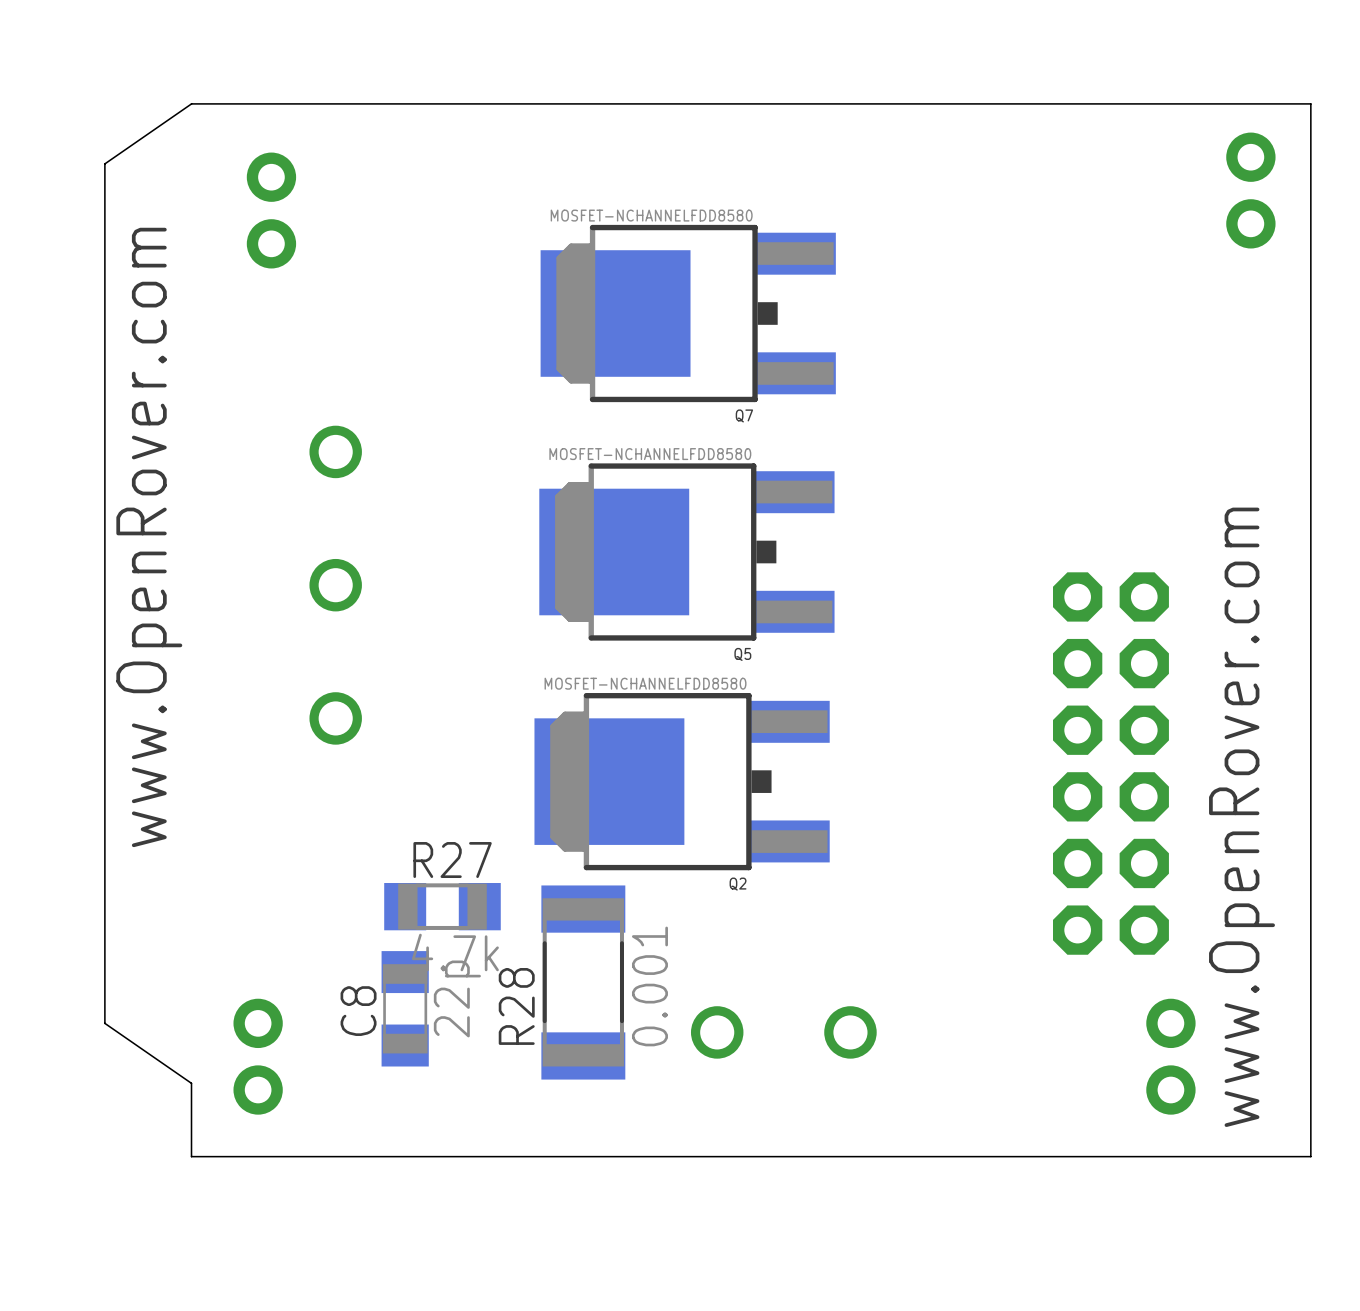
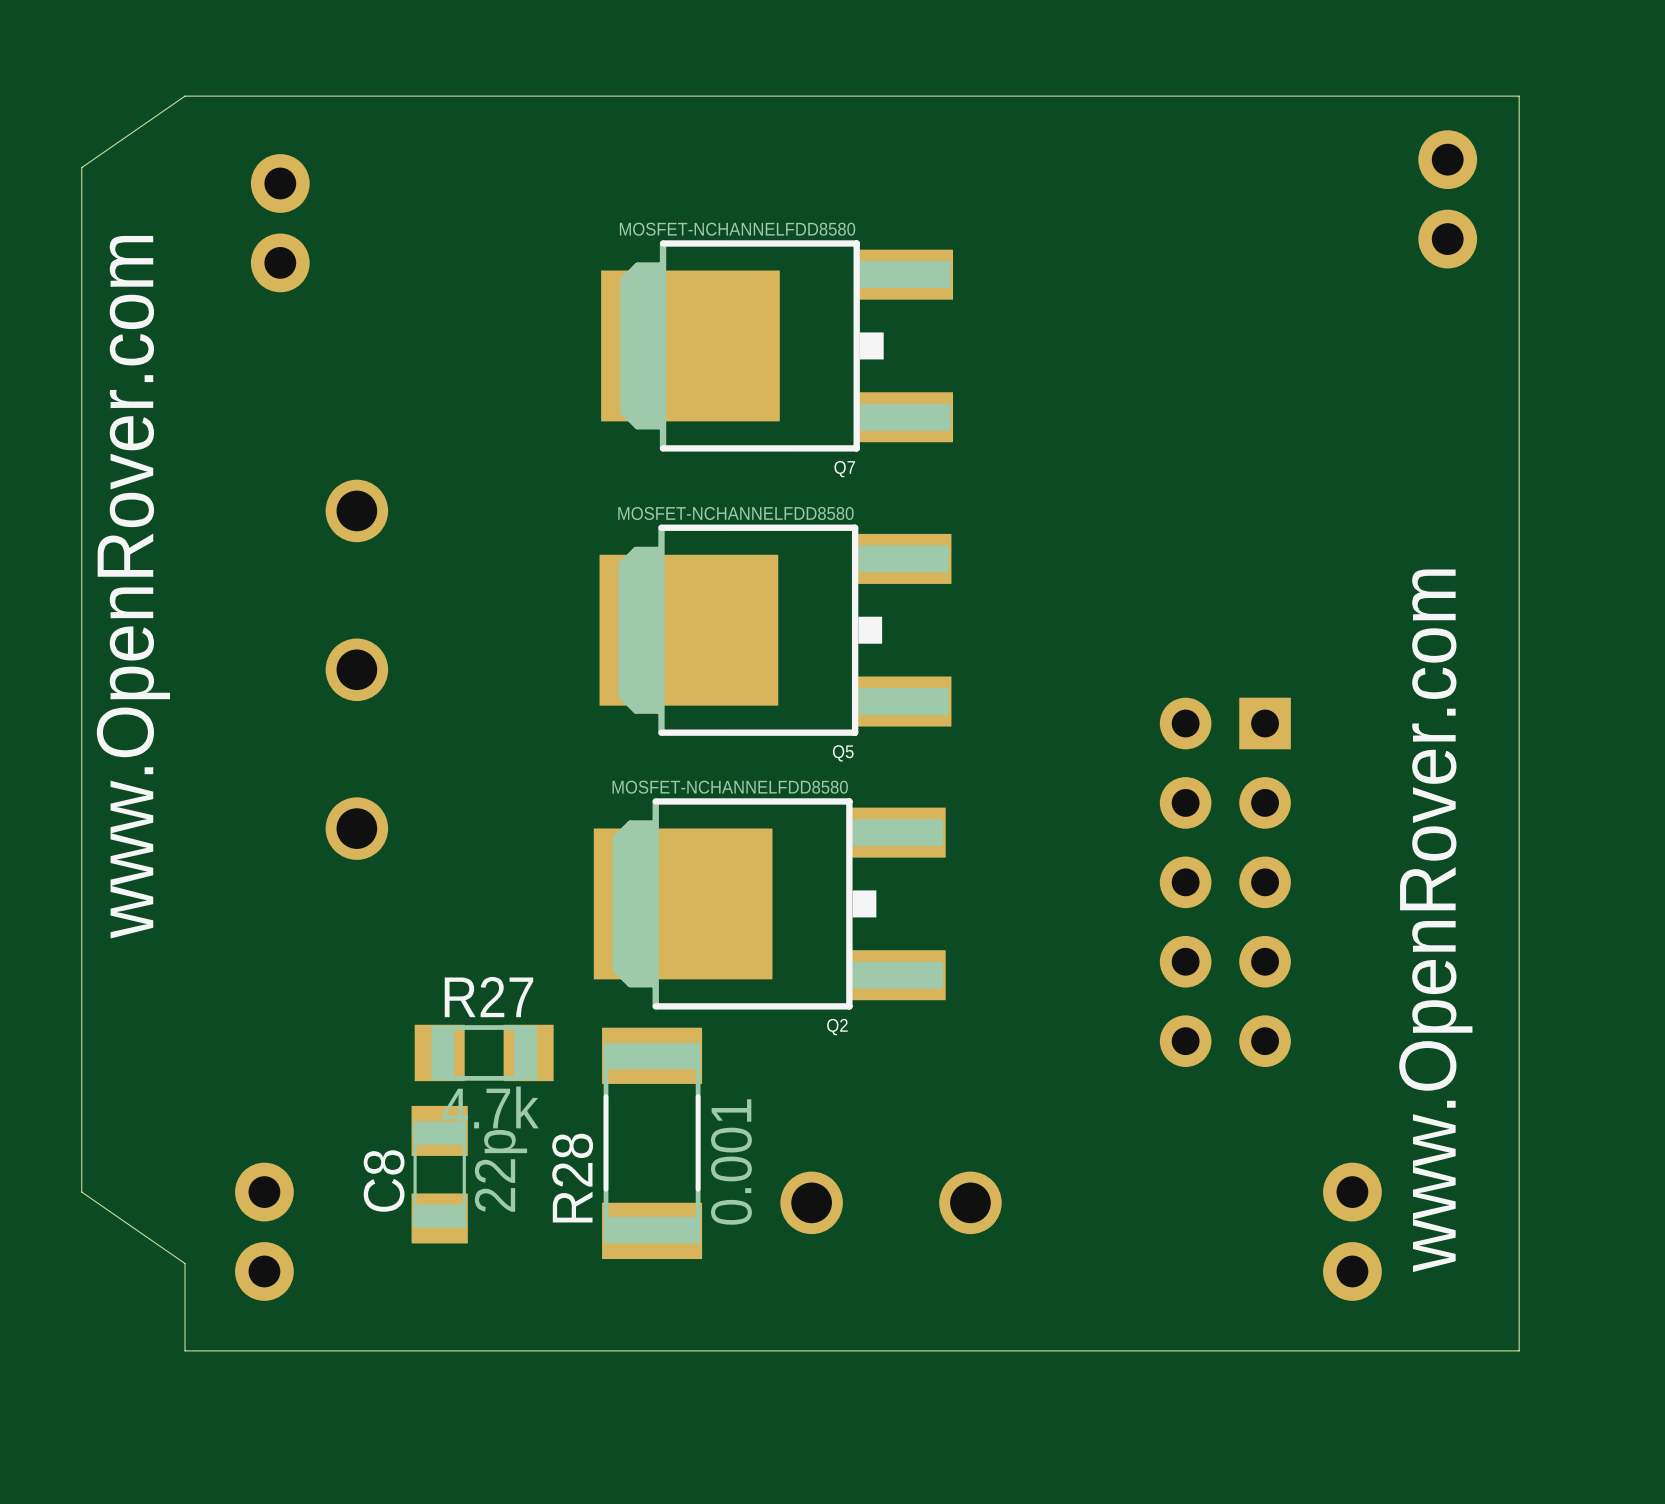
part: none -> (1225, 882)
part: (1110, 763) -> none

